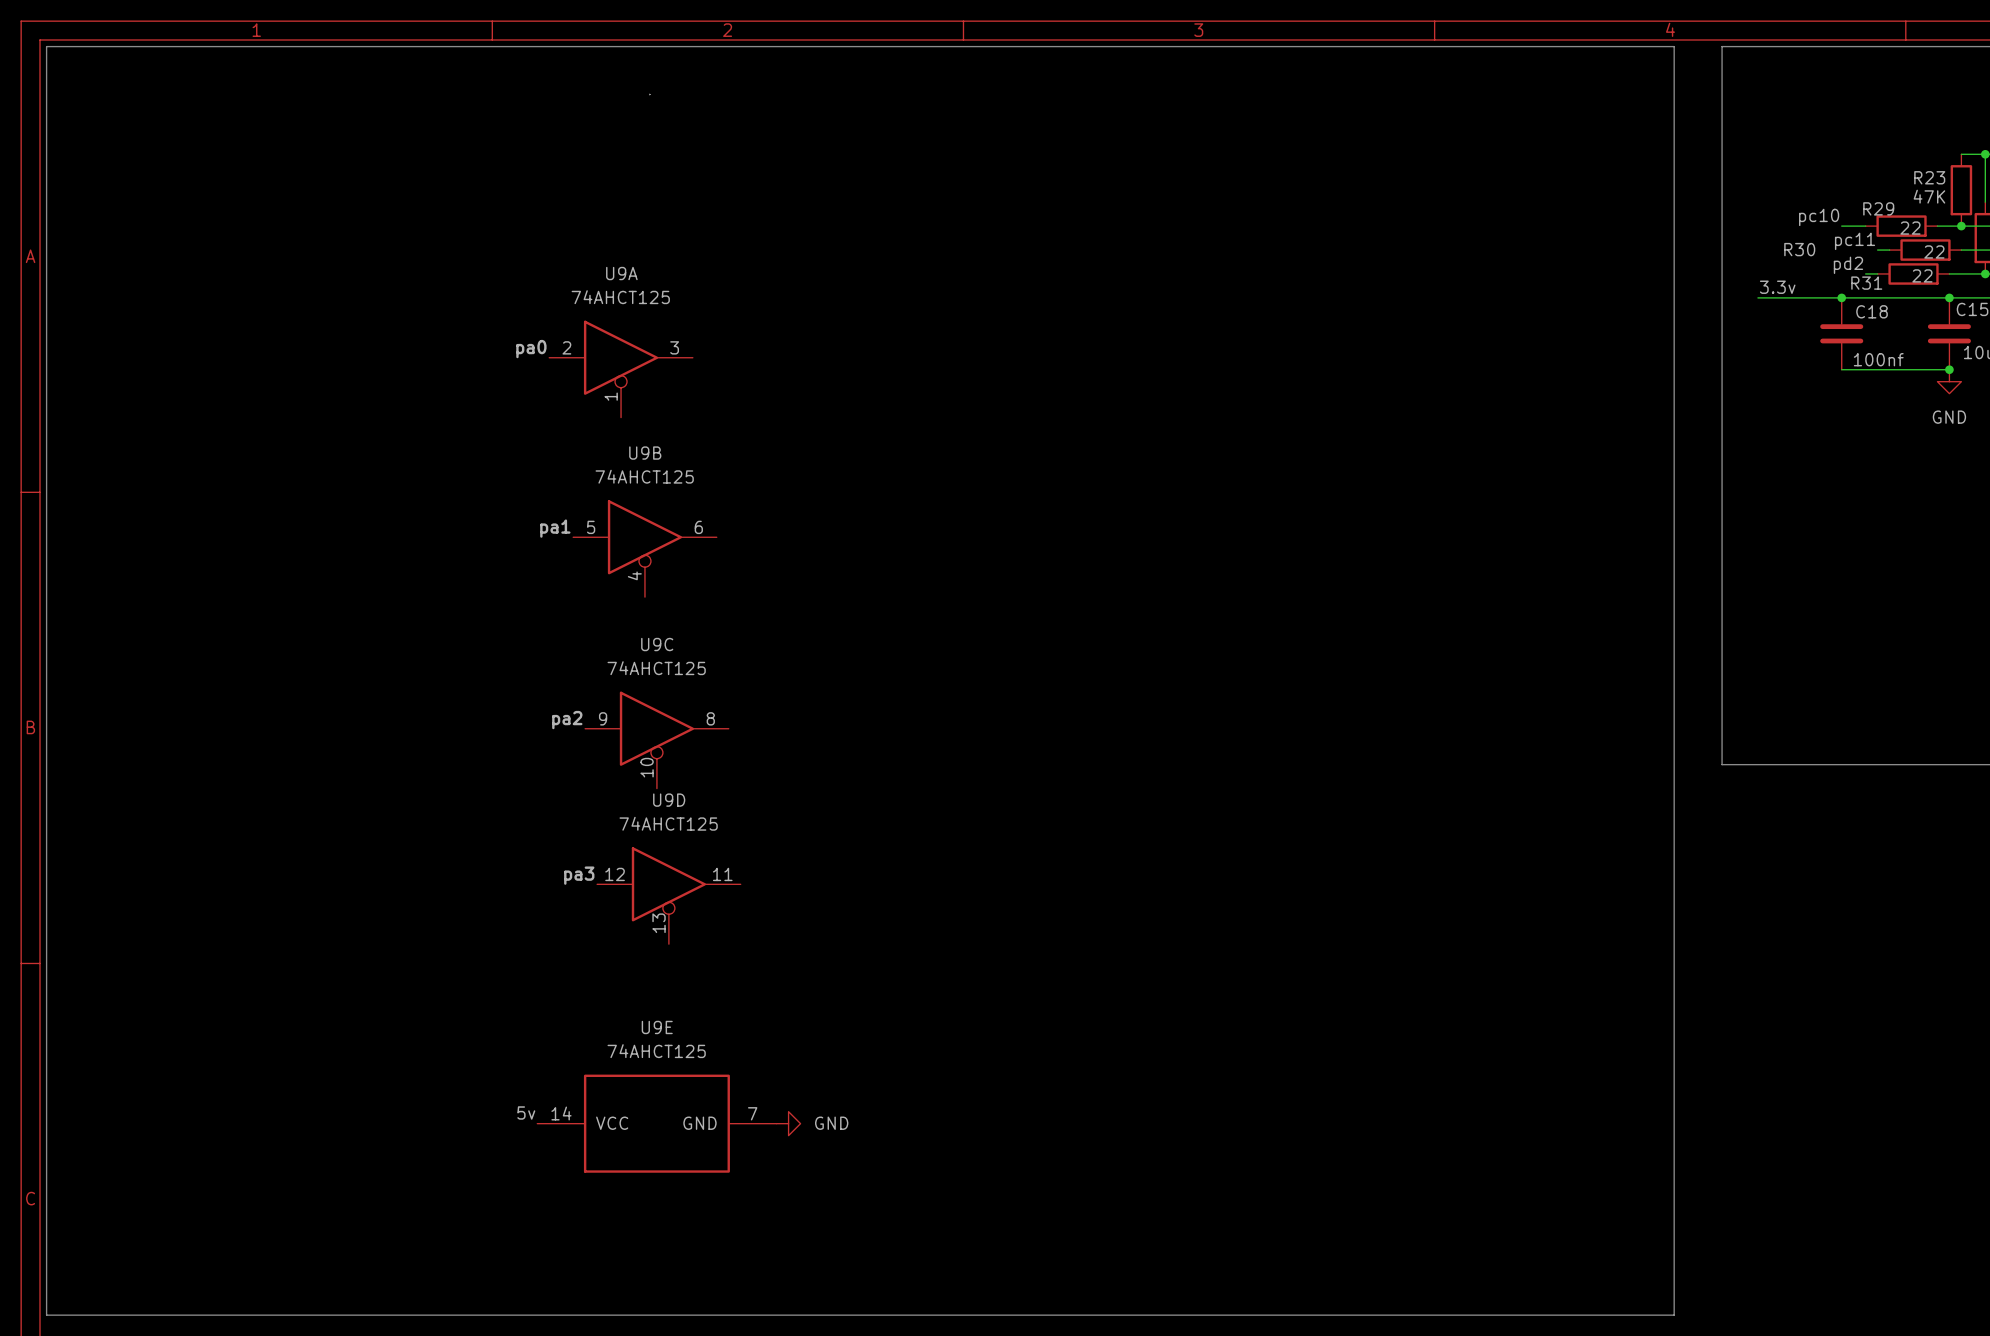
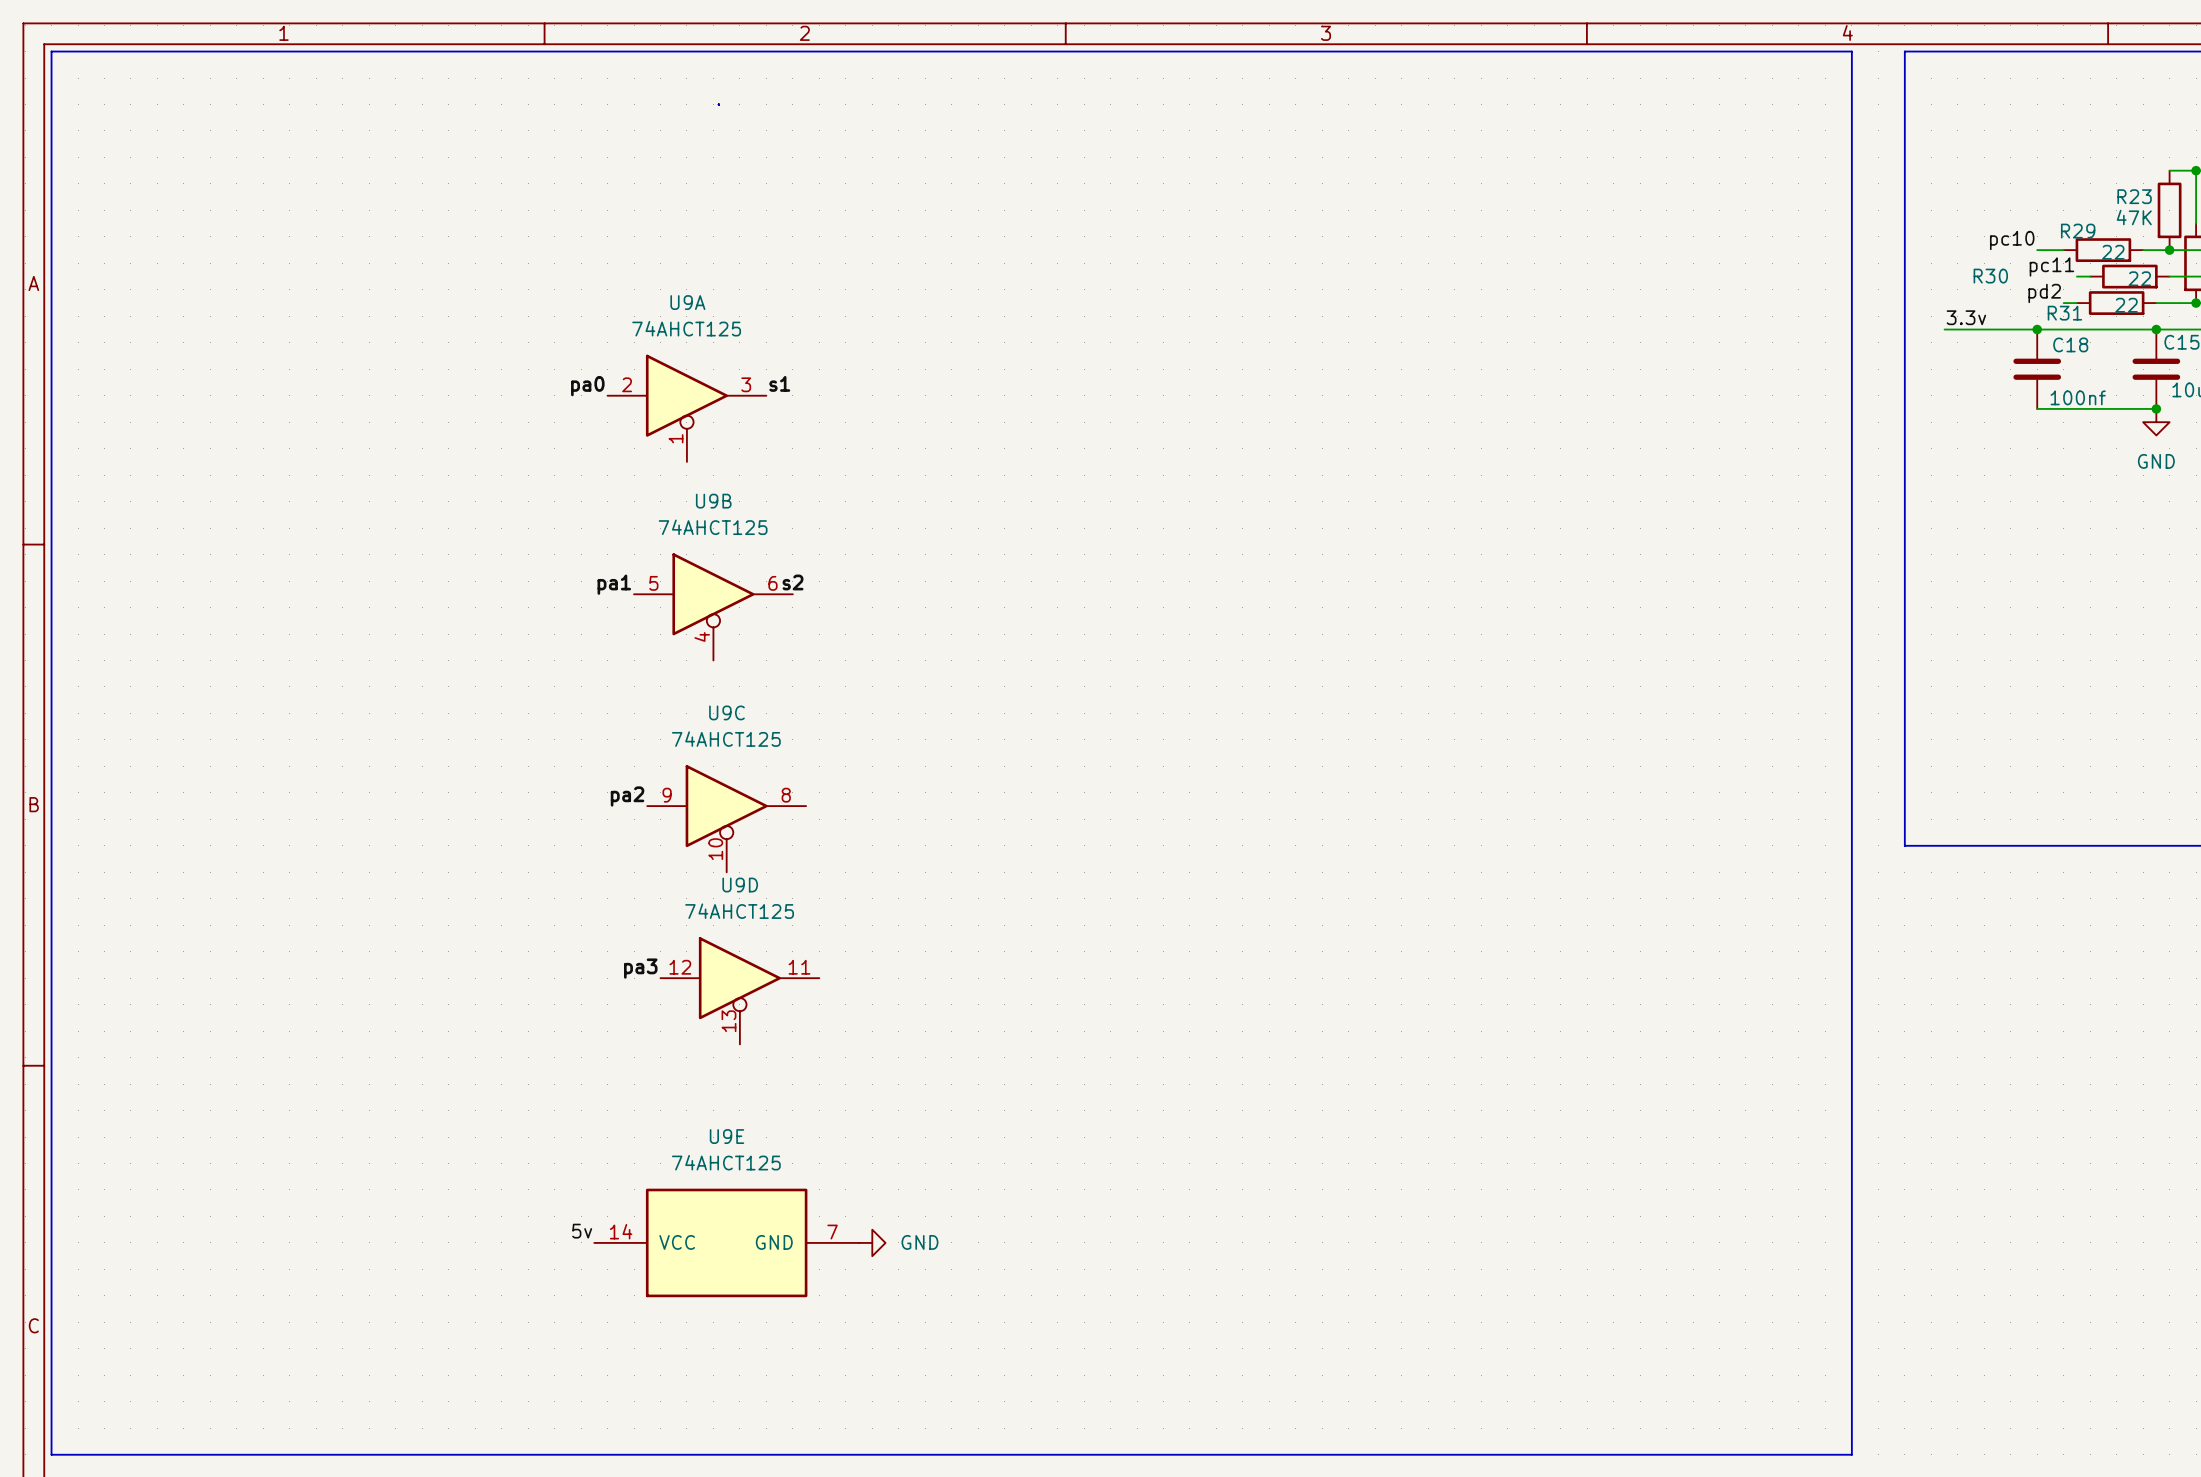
label: none -> s1 (779, 383)
label: none -> s2 (793, 582)

